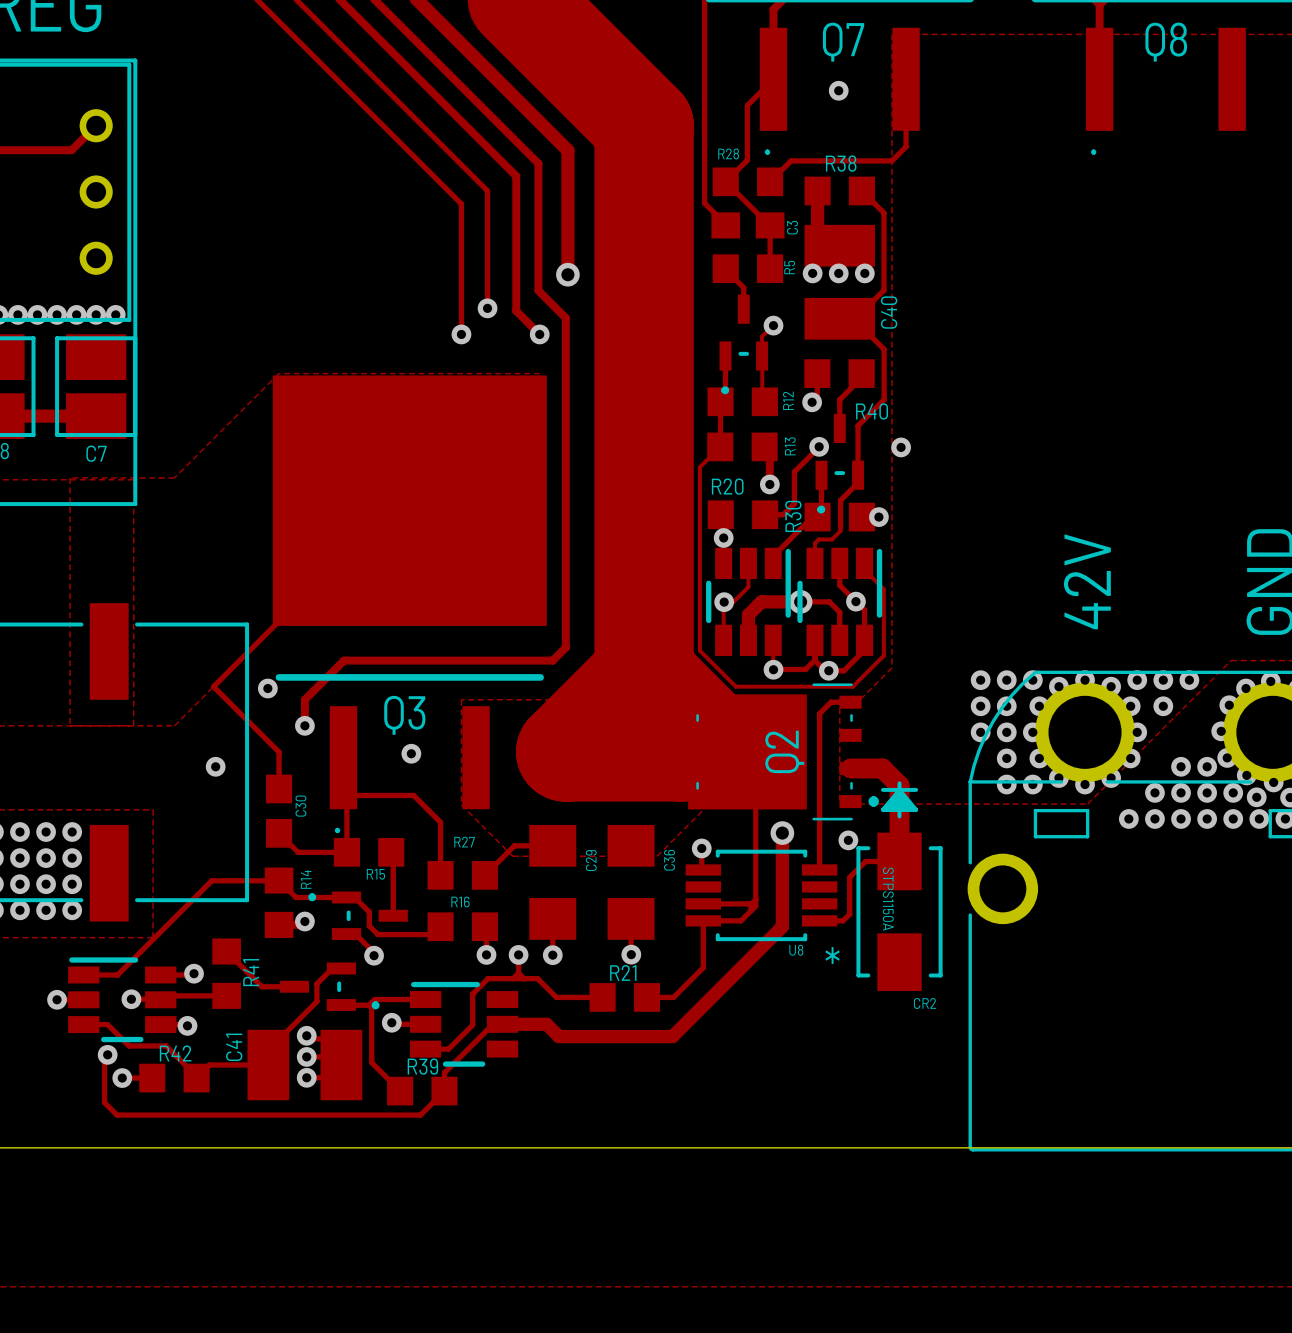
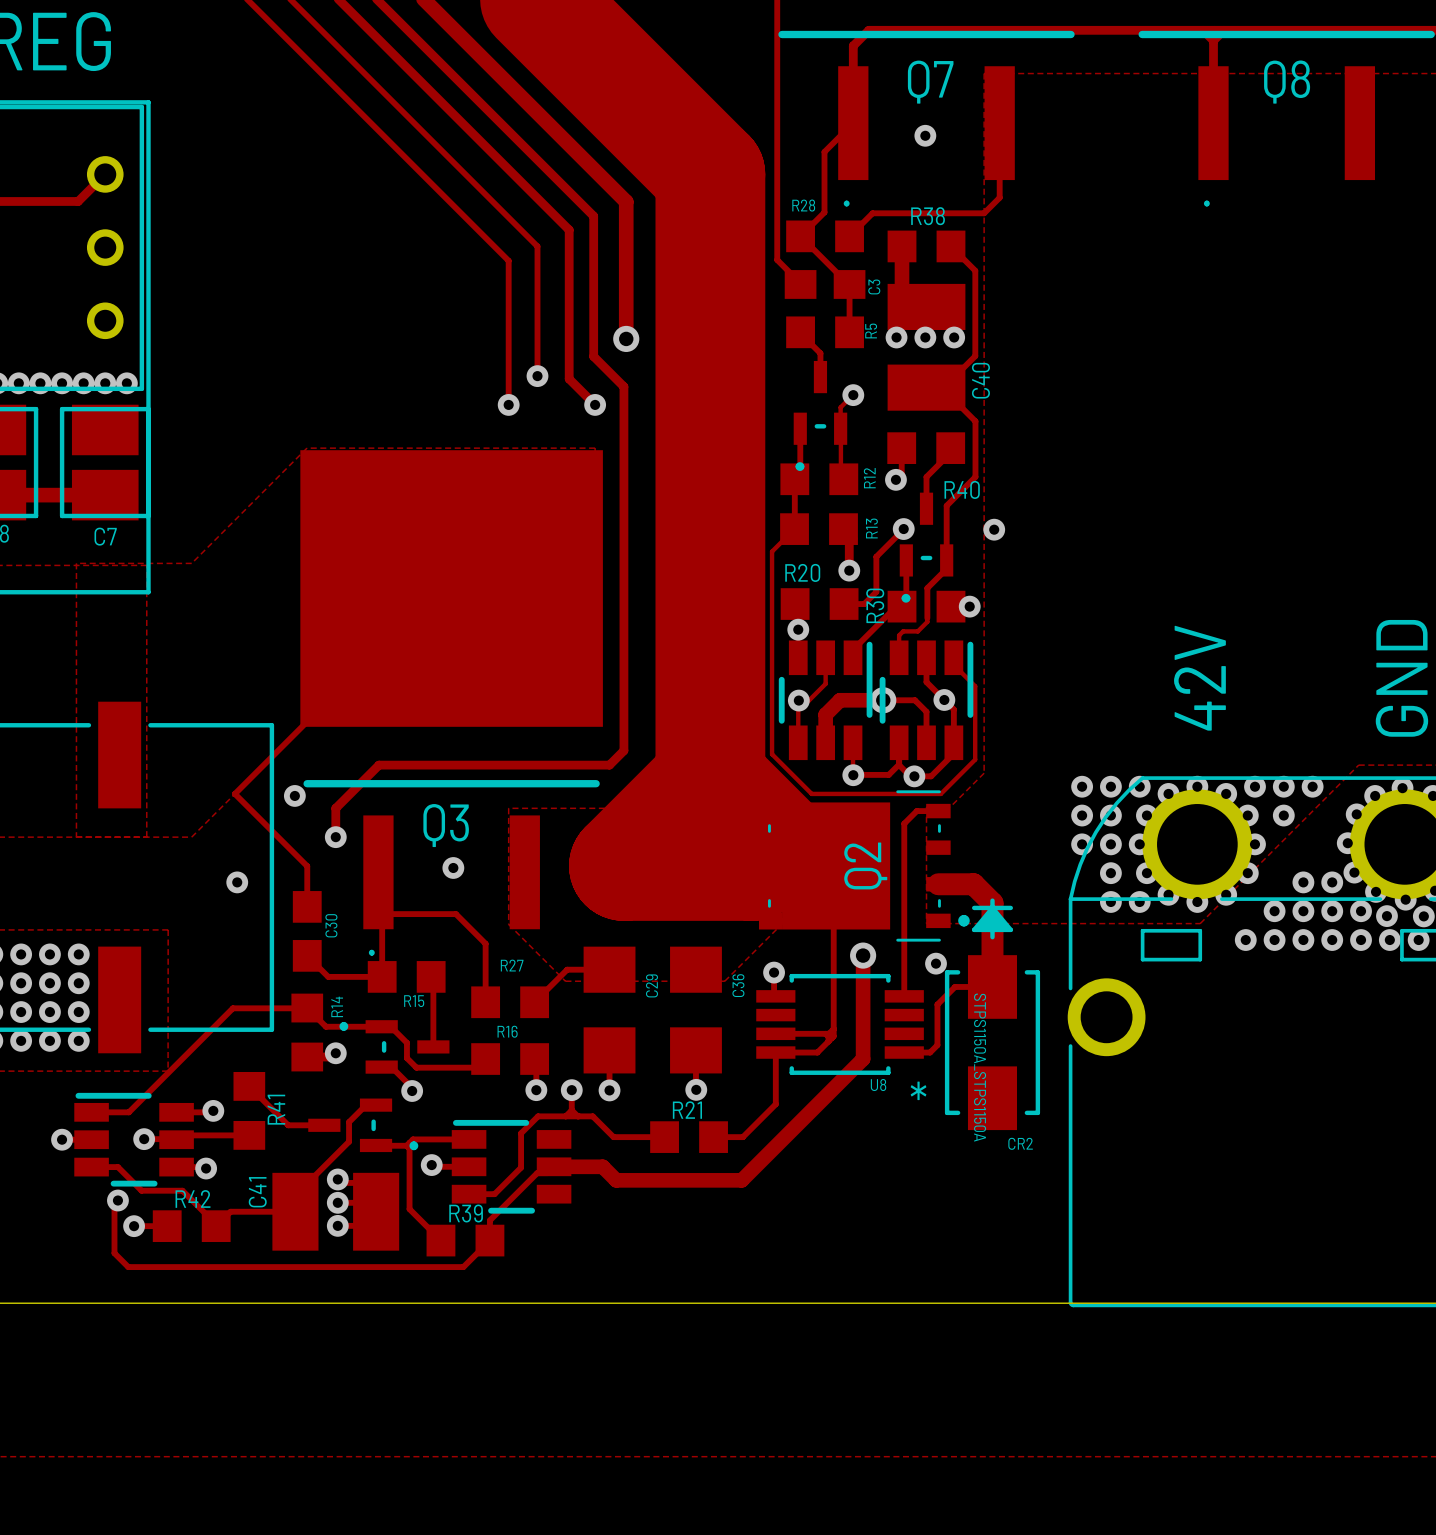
CR2 value: STPS1150A (888, 899) -> STPS1150A_STPS1150A (980, 1067)

